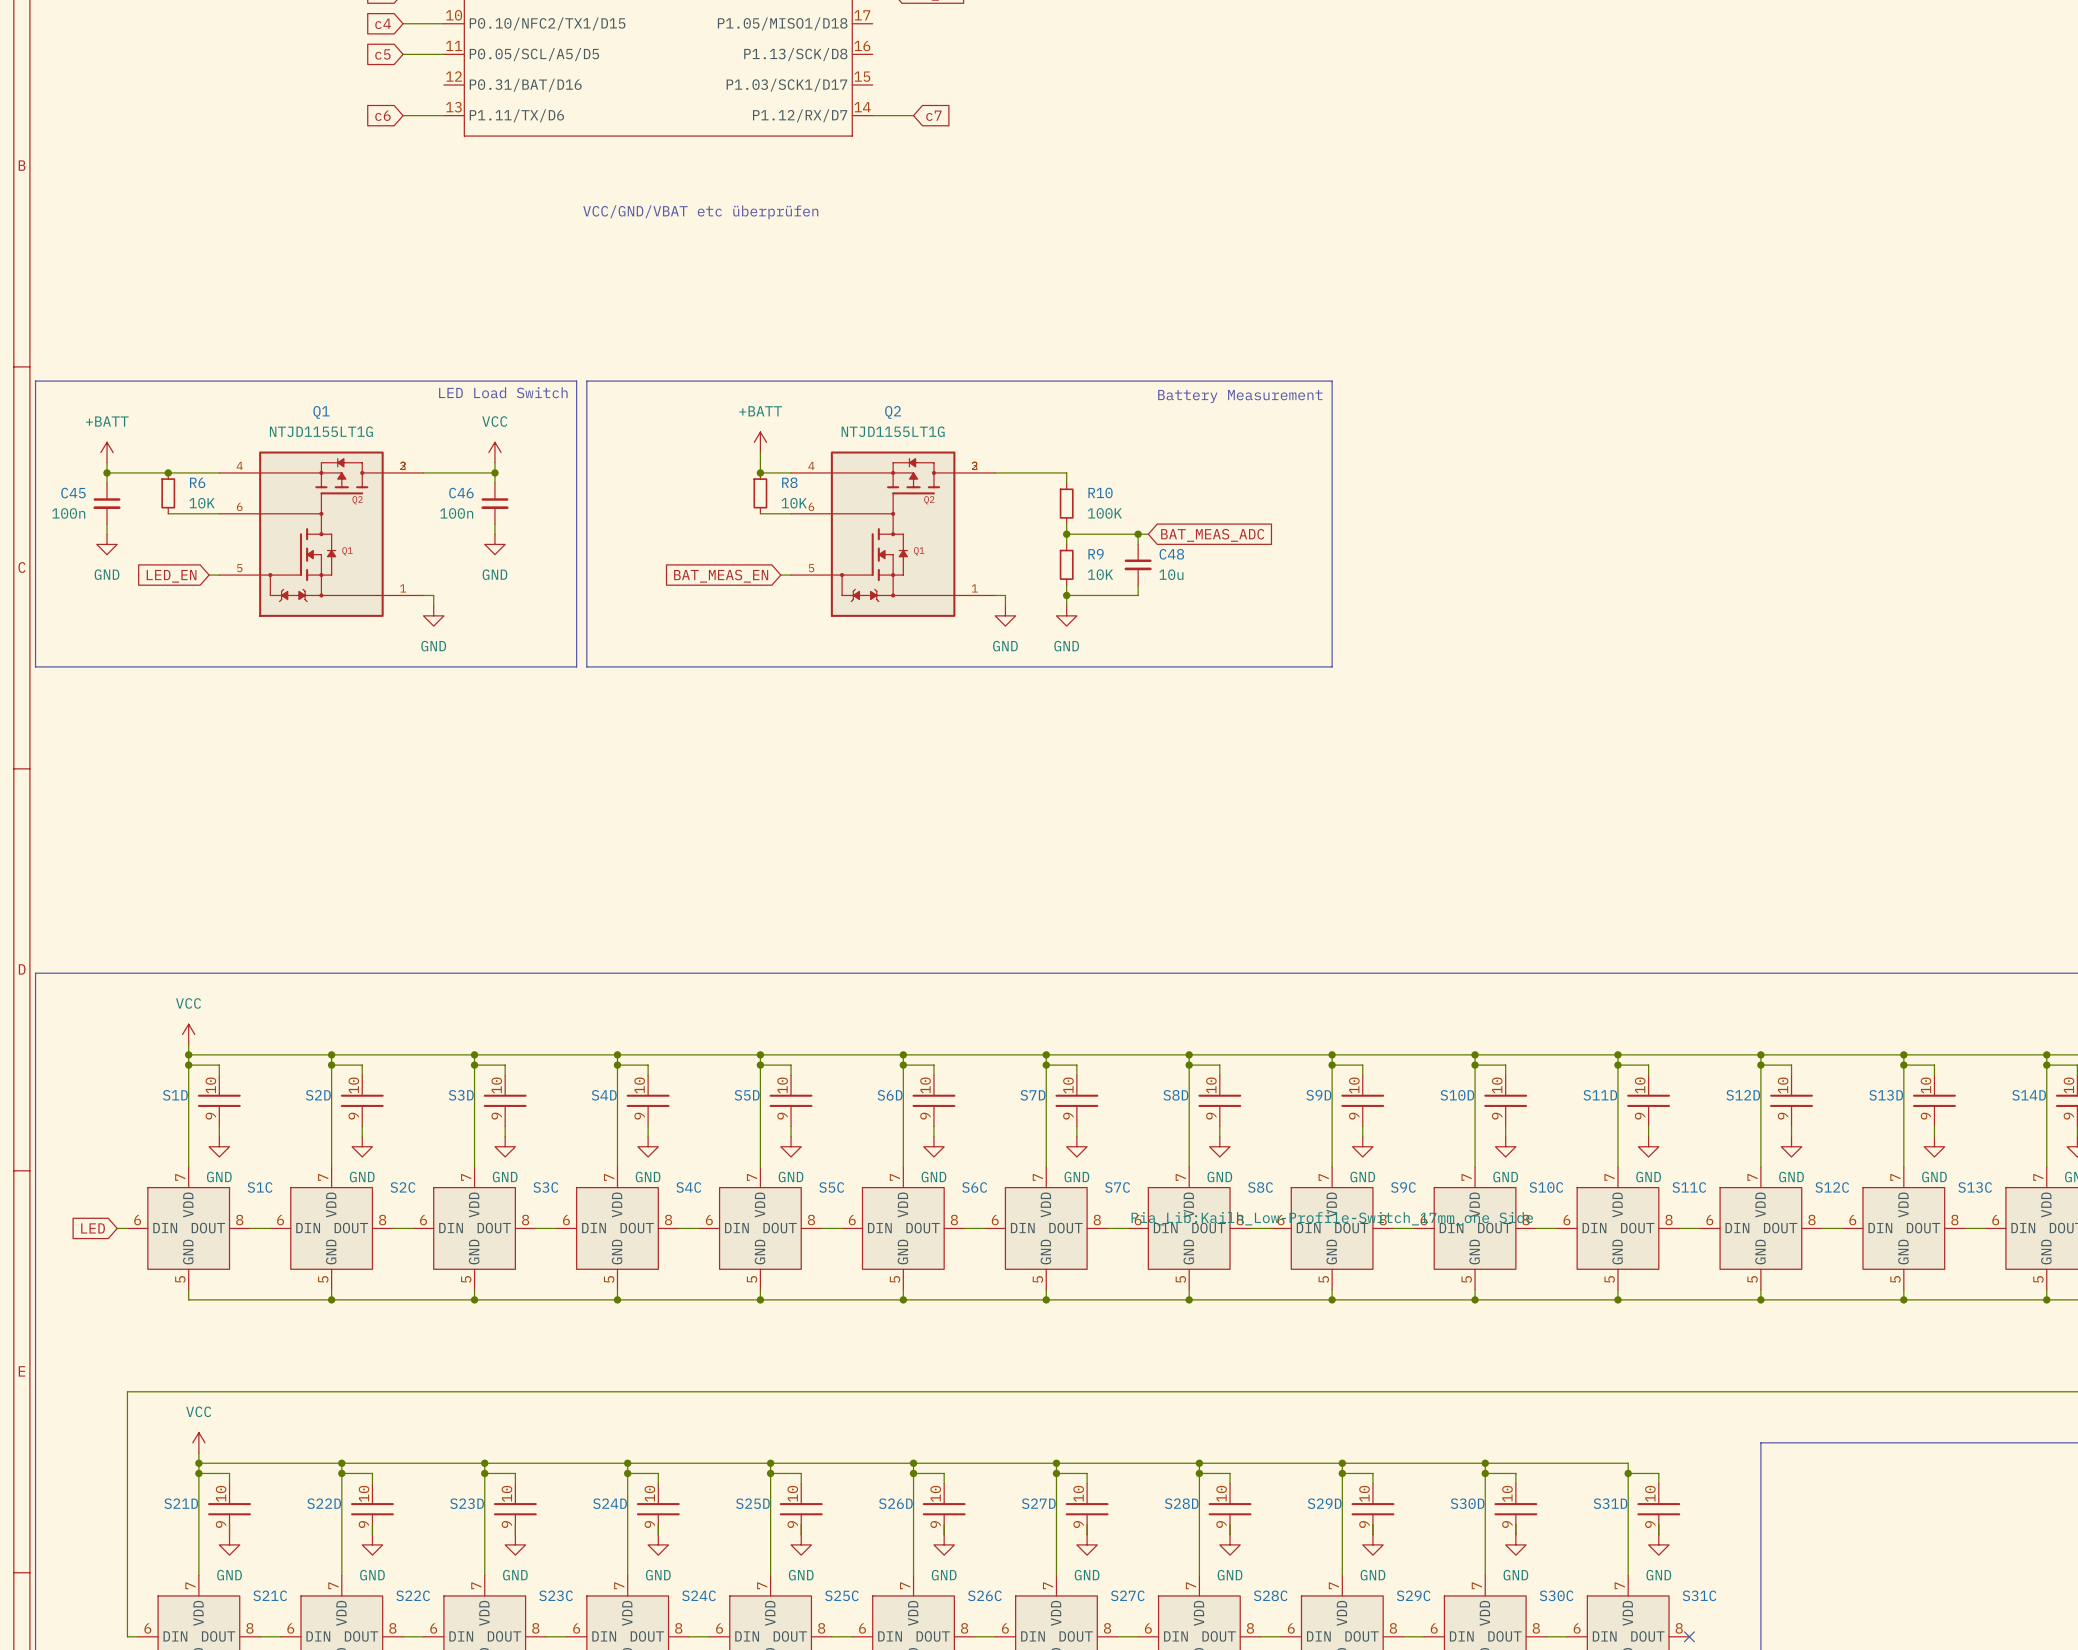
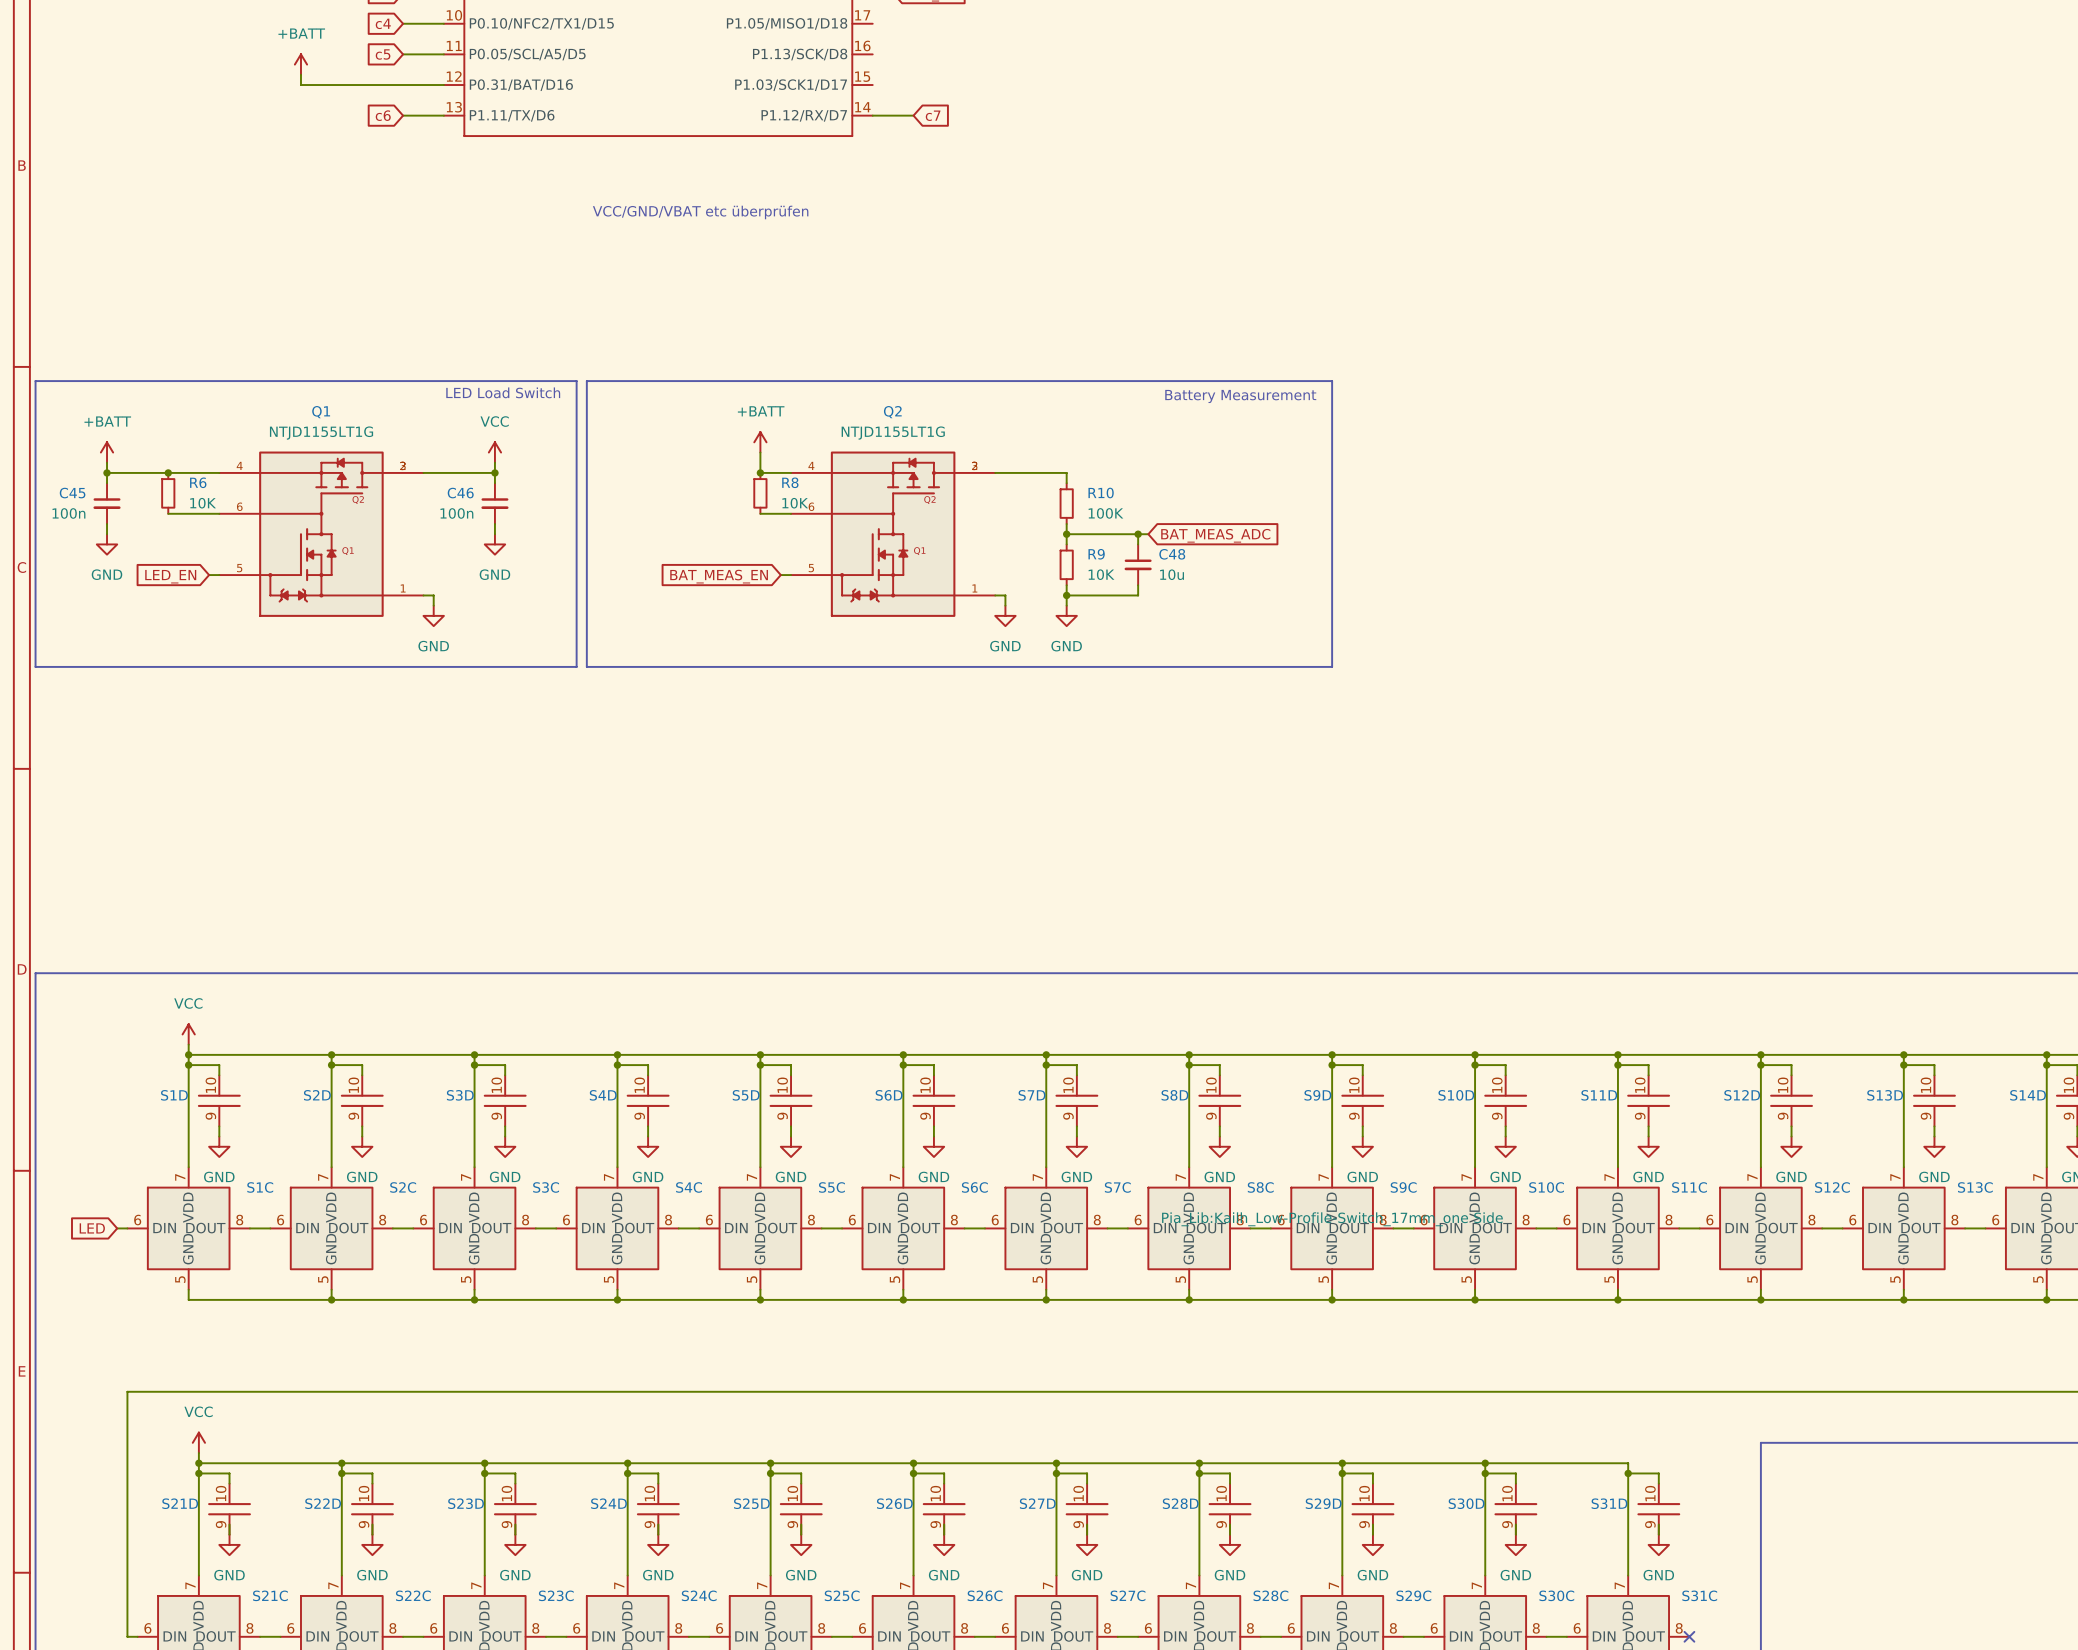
power symbol: none -> +BATT (300, 64)
wire: none -> (300, 74) (300, 85) (443, 85)

